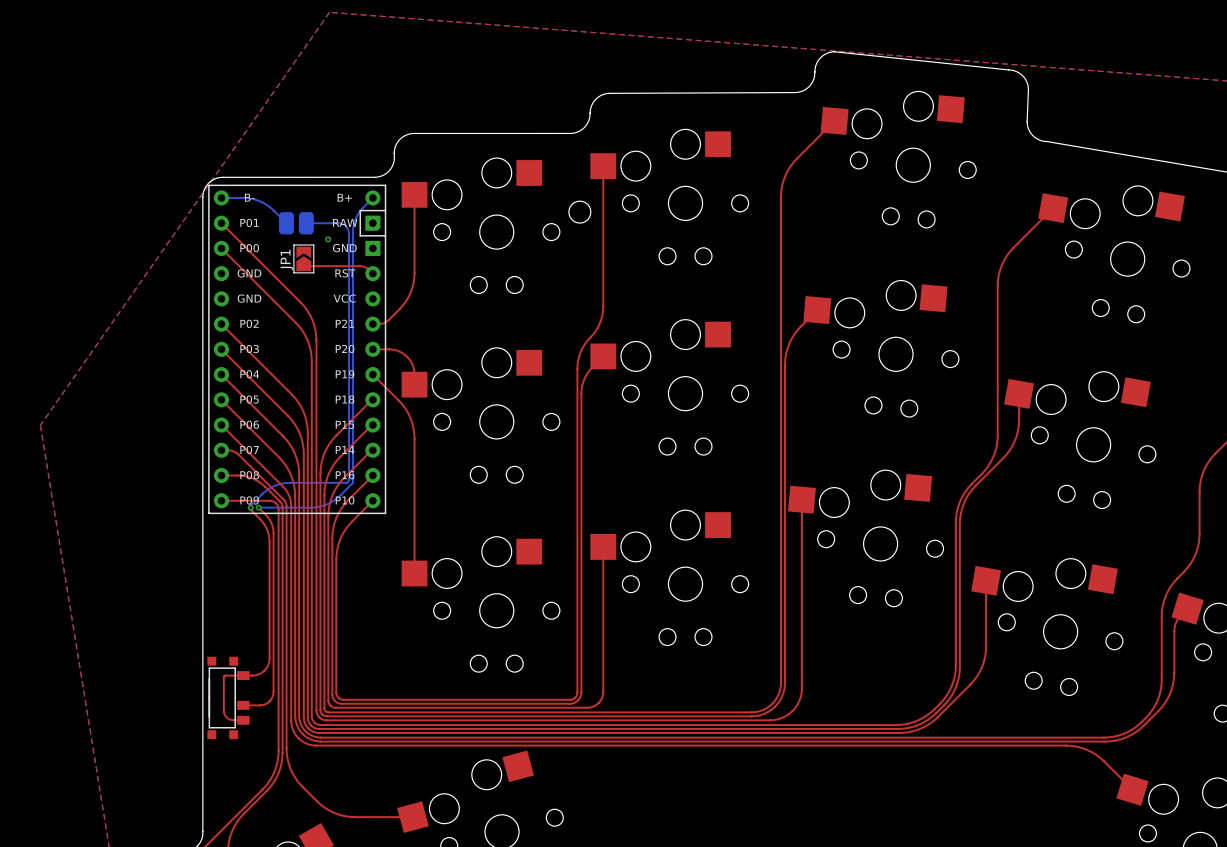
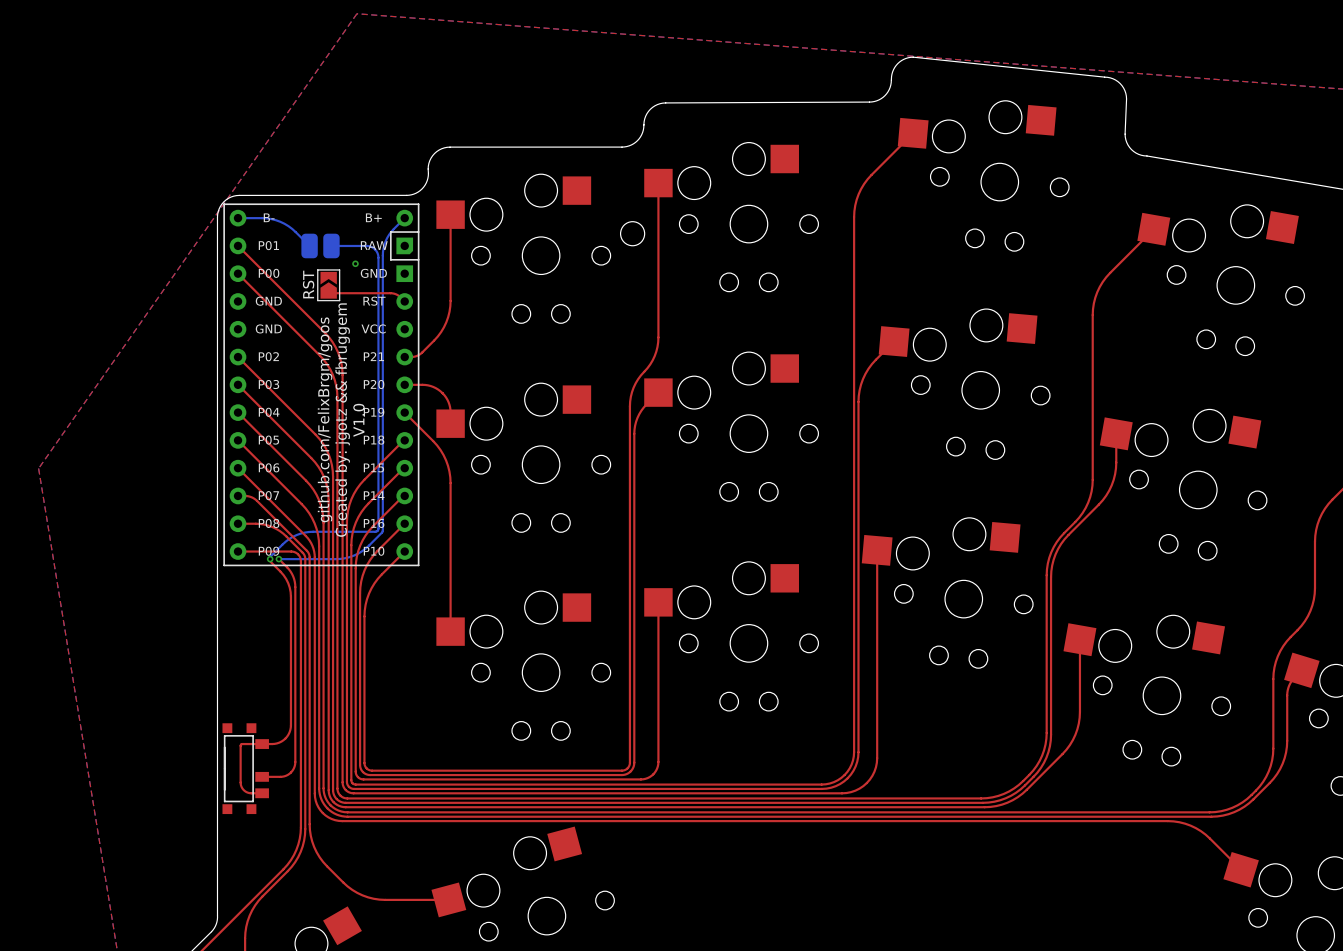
JP1 name: JP1 (286, 259) -> RST (308, 284)
text: none -> github.com/FelixBrgm/goos (325, 419)
text: none -> Created by: jgotz && fbruggem (342, 420)
text: none -> V1.0 (358, 420)

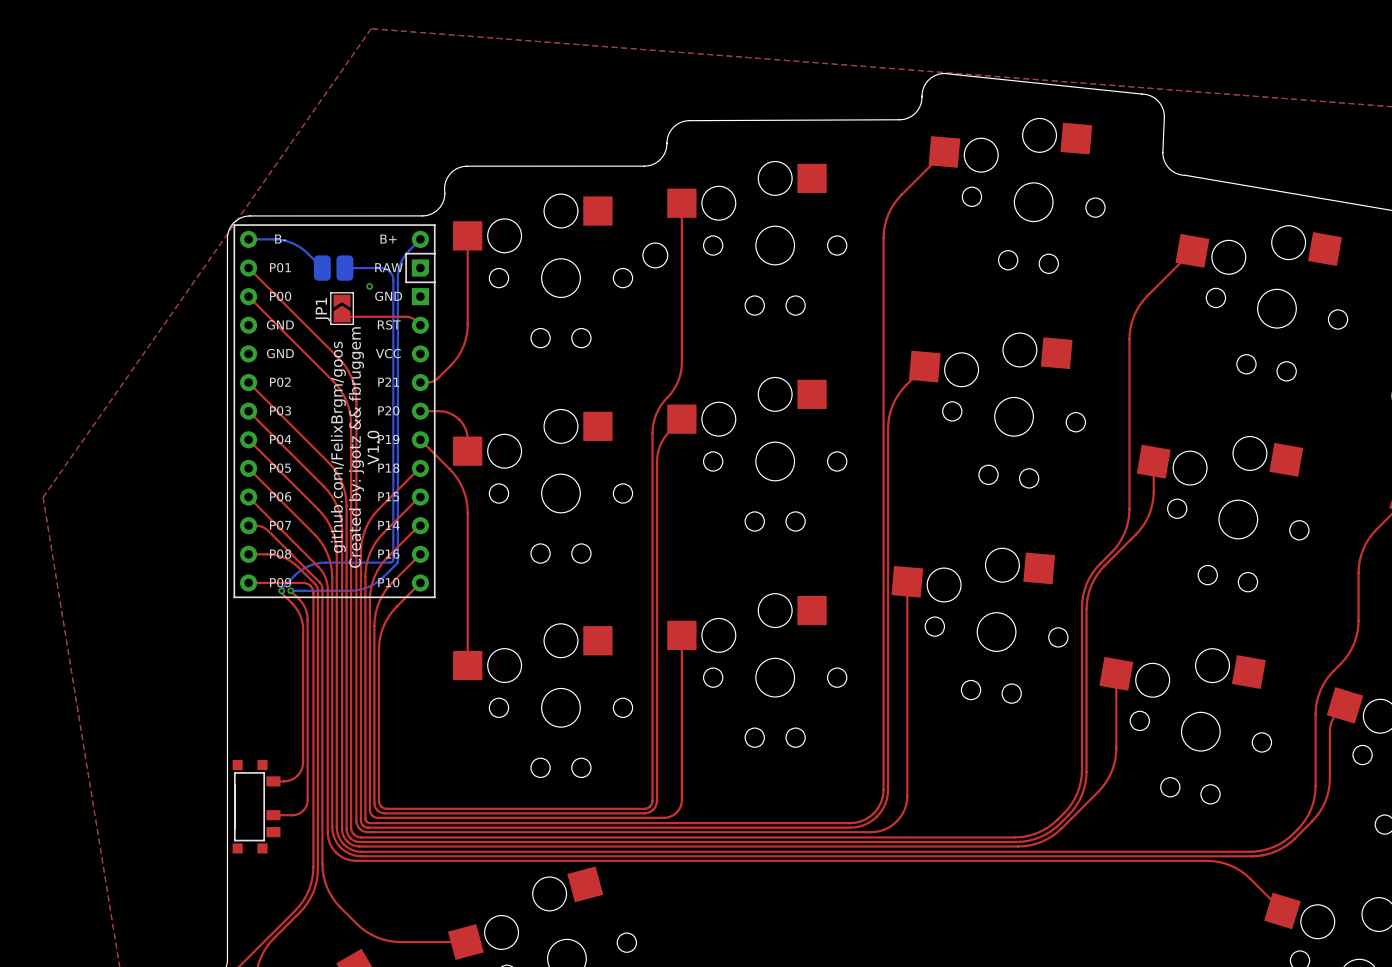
RST name: RST (308, 284) -> JP1 (322, 309)
top track: (262, 744) (242, 744) (240, 745) (241, 786) (248, 792) (262, 793) -> none

